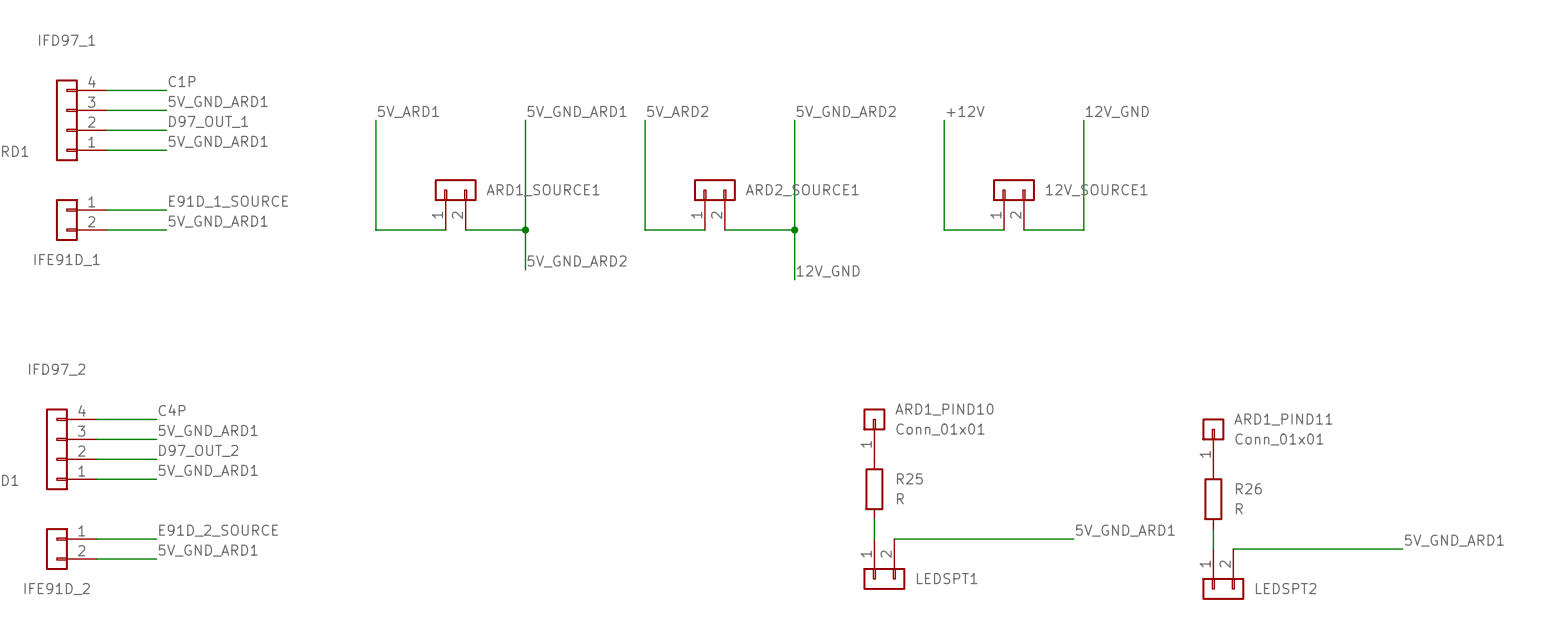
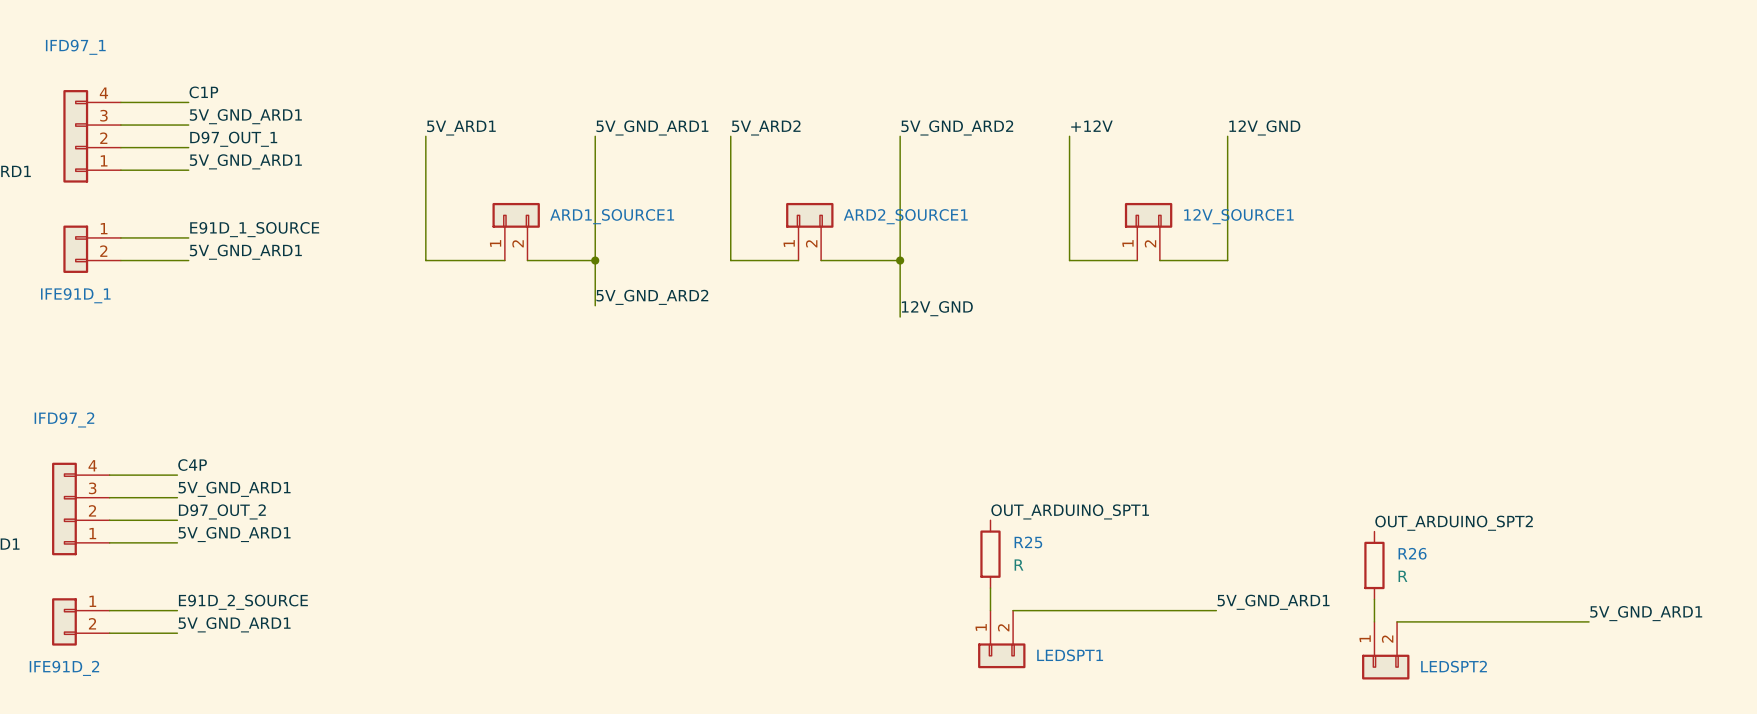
ARD1_PIND10: Conn_01x01 (874, 433) -> none
ARD1_PIND11: Conn_01x01 (1213, 443) -> none
label: none -> OUT_ARDUINO_SPT1 (1070, 511)
label: none -> OUT_ARDUINO_SPT2 (1454, 523)

